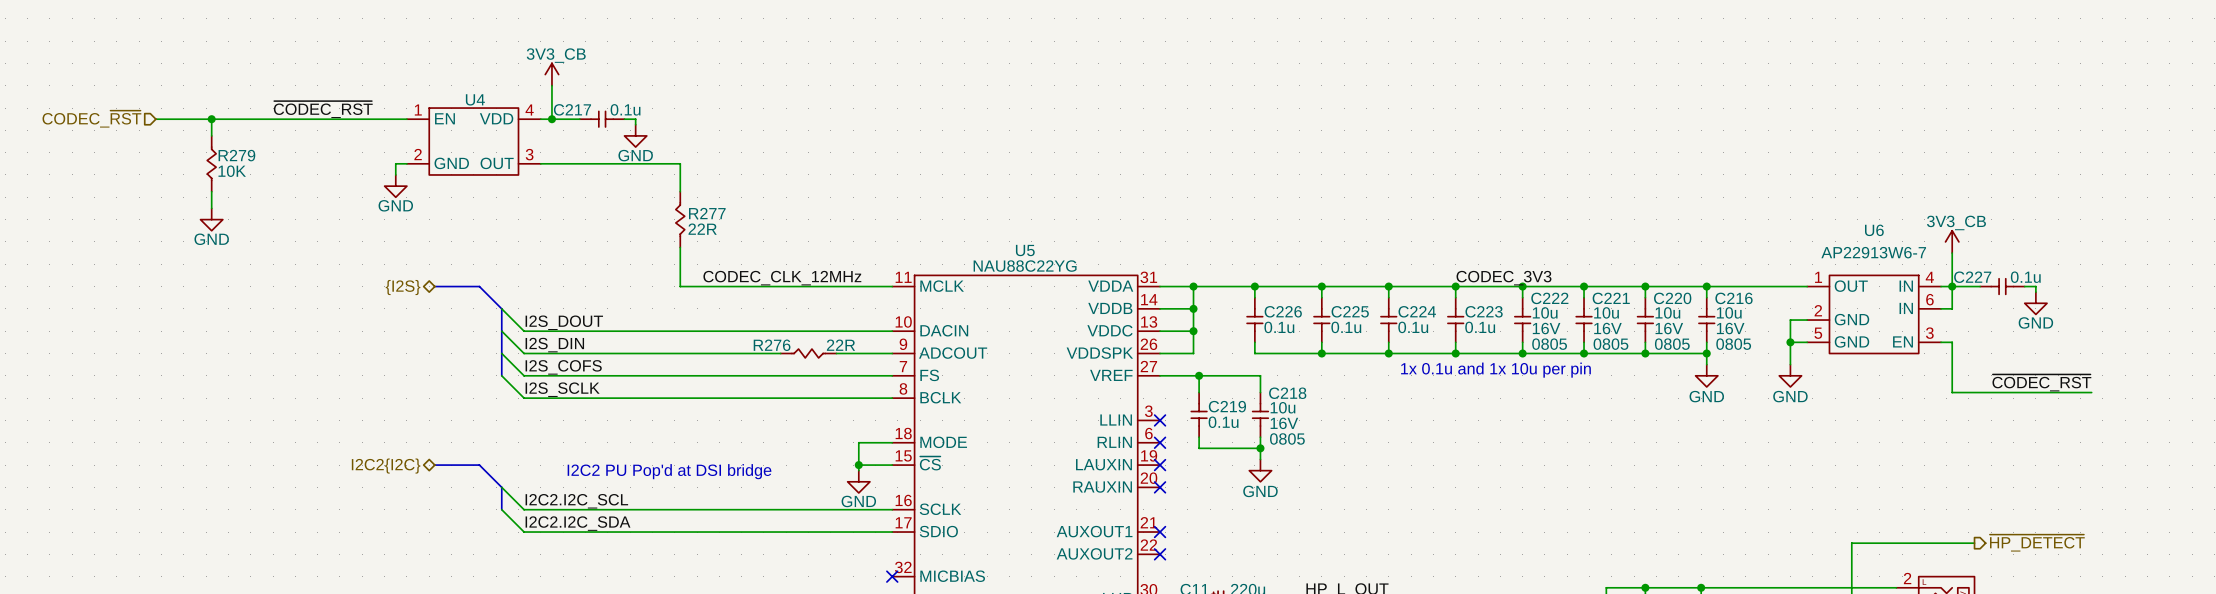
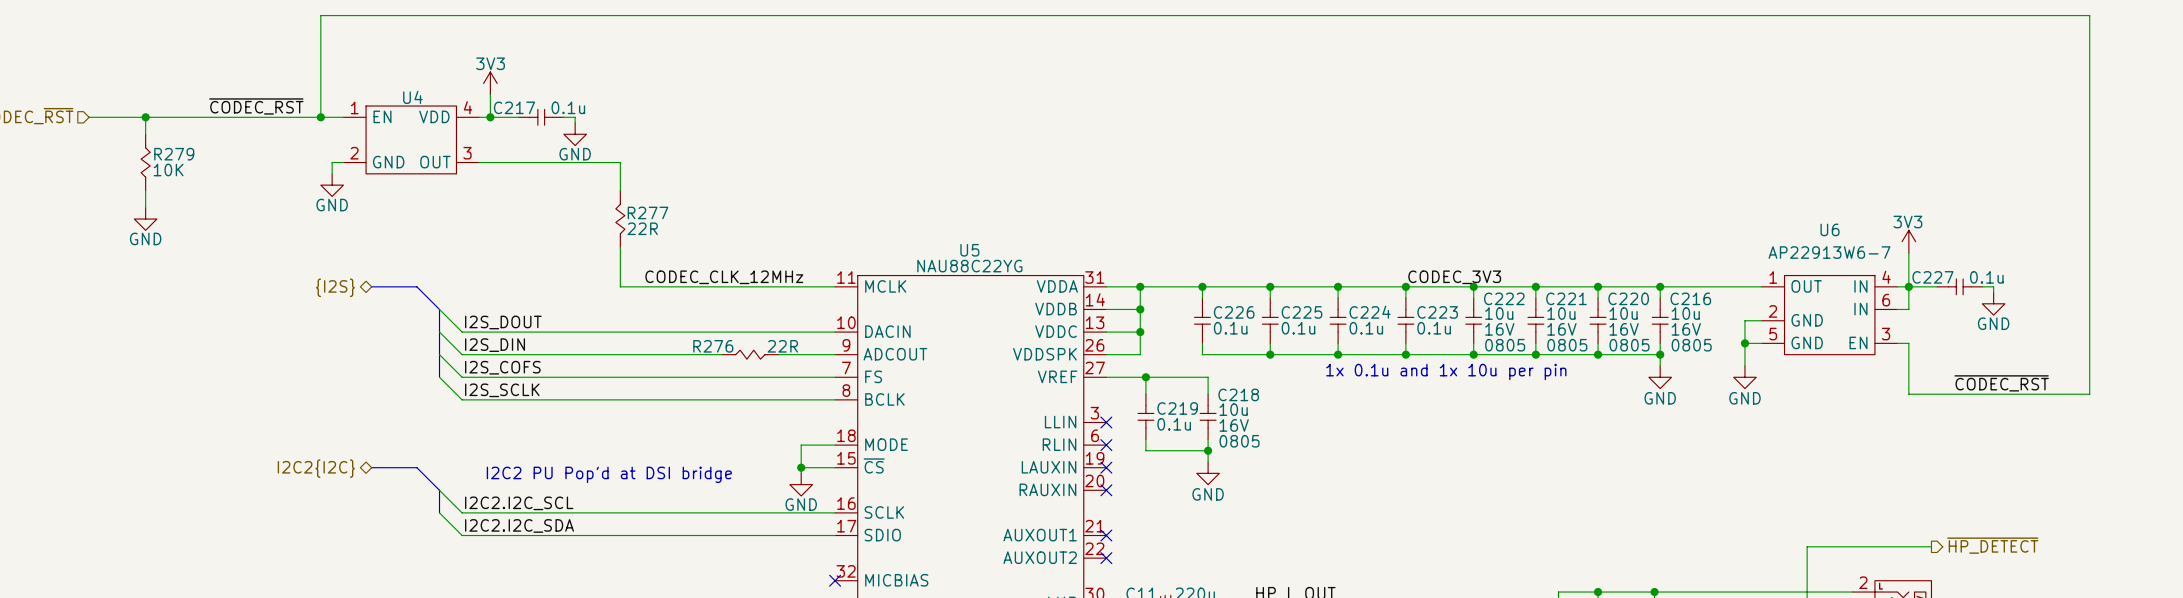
power symbol: 3V3_CB (551, 74) -> none
power symbol: none -> 3V3 (490, 83)
wire: none -> (320, 117) (320, 15) (2089, 15) (2089, 394) (2050, 394)
junction: none -> (320, 117)
power symbol: 3V3_CB (1952, 241) -> 3V3 (1908, 241)

